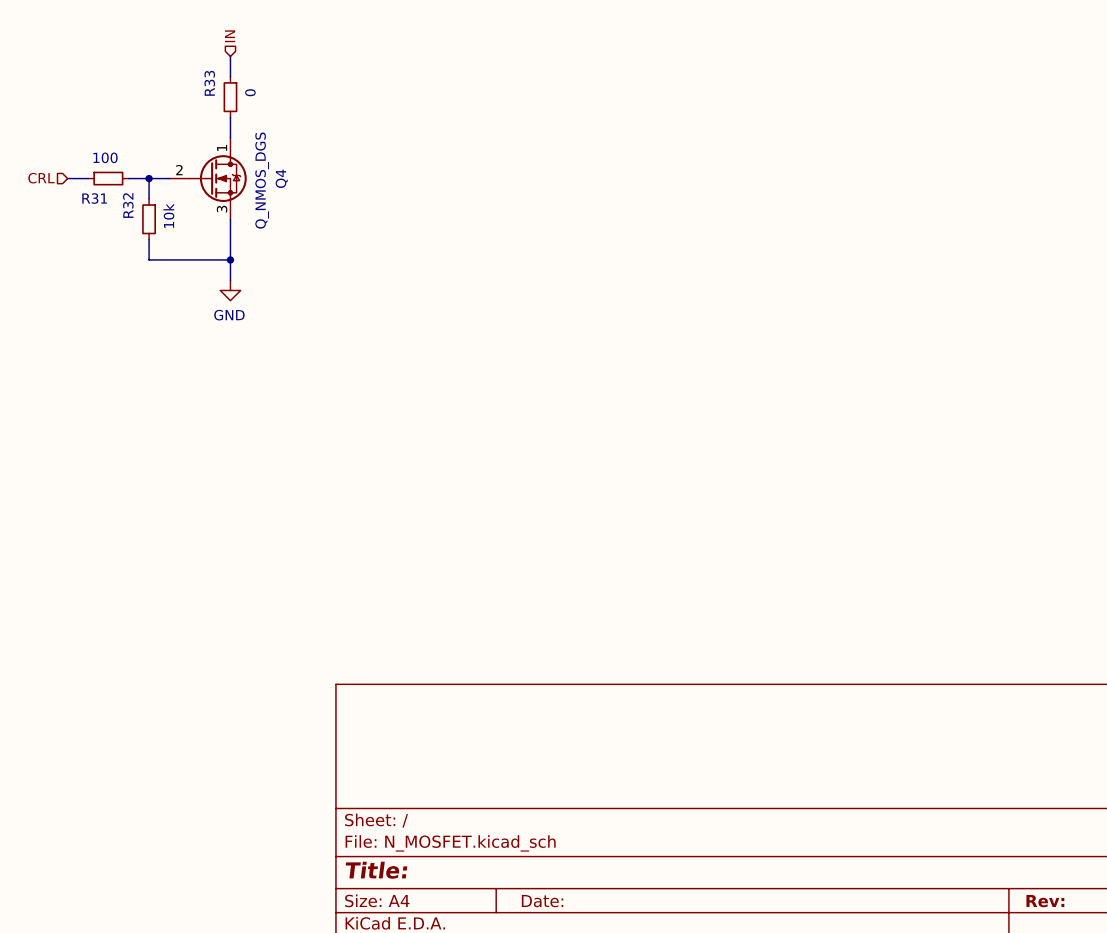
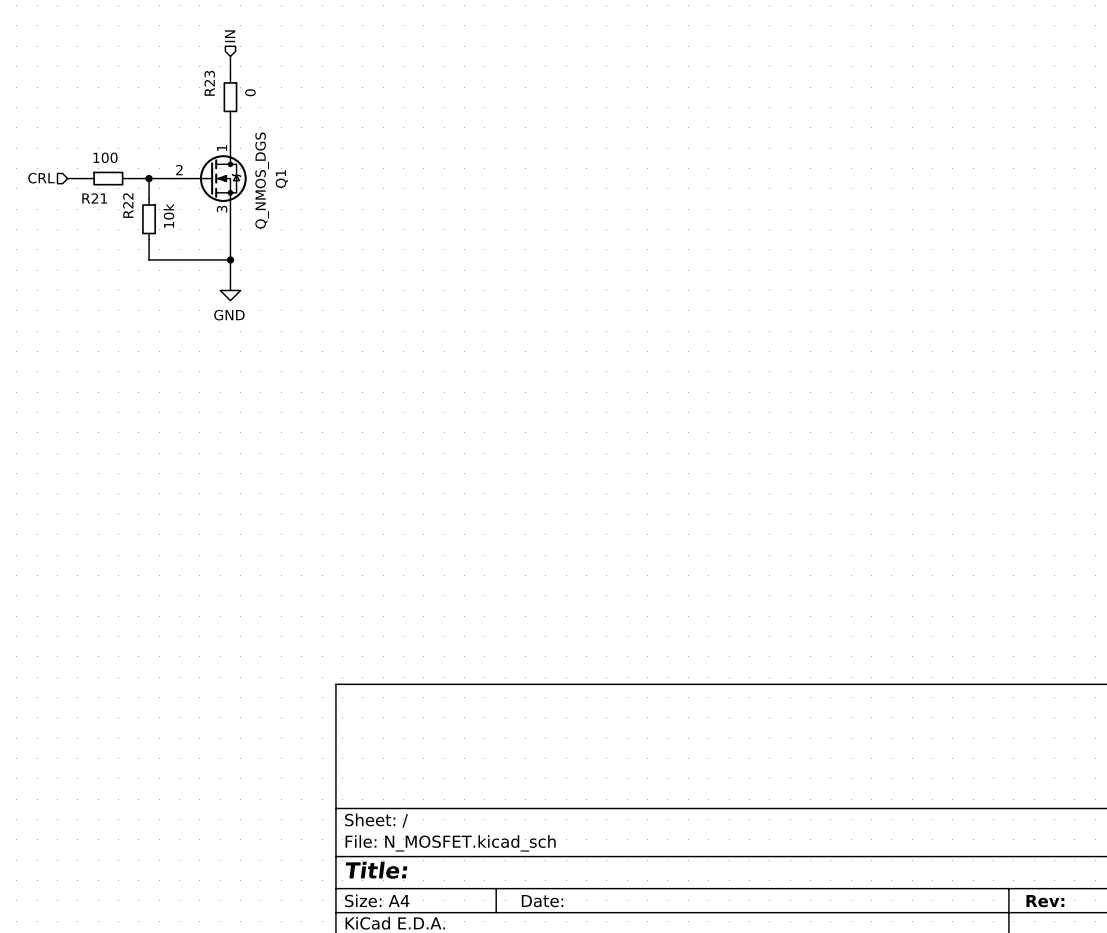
R33 name: R33 (209, 83) -> R23 (209, 83)
Q4 name: Q4 (281, 178) -> Q1 (281, 179)
R31 name: R31 (94, 198) -> R21 (94, 198)
R32 name: R32 (128, 205) -> R22 (128, 205)

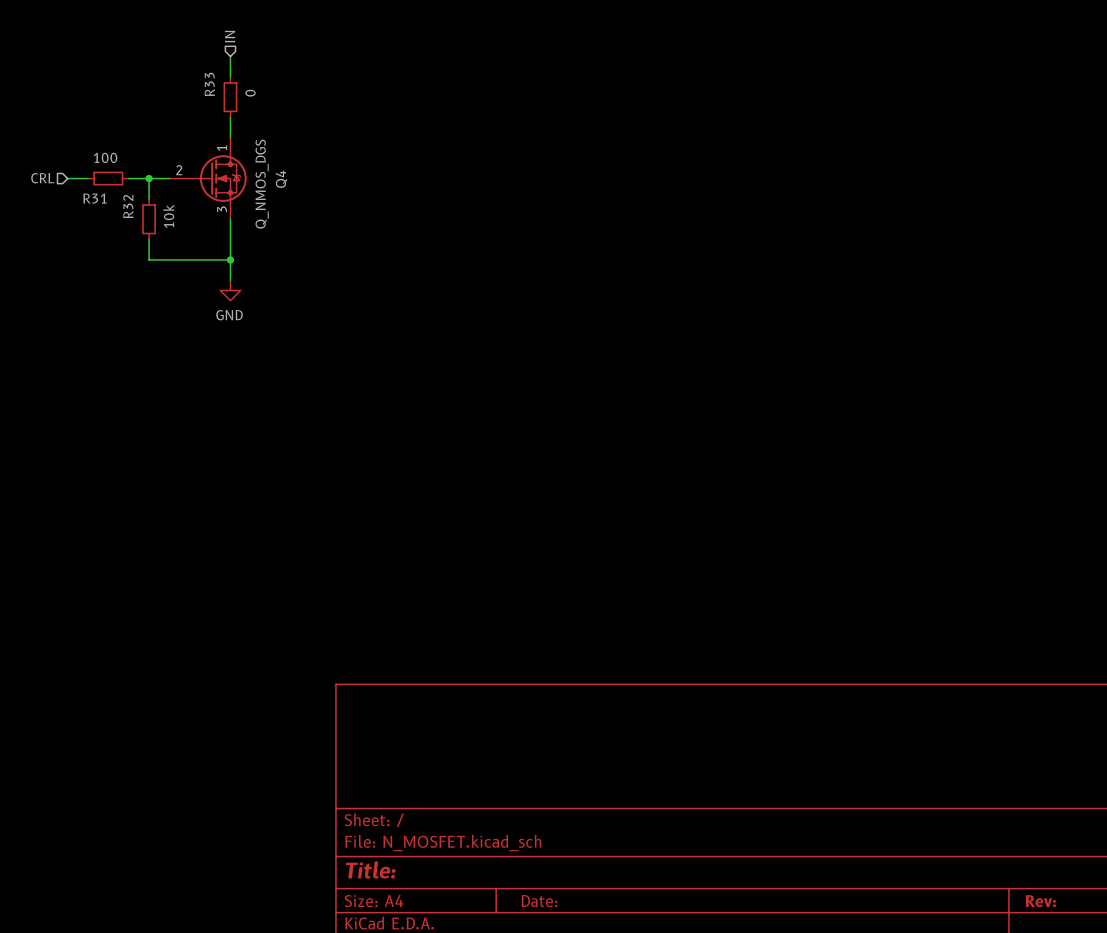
R23 name: R23 (209, 83) -> R33 (209, 84)
Q1 name: Q1 (281, 179) -> Q4 (281, 179)
R21 name: R21 (94, 198) -> R31 (94, 198)
R22 name: R22 (128, 205) -> R32 (128, 206)

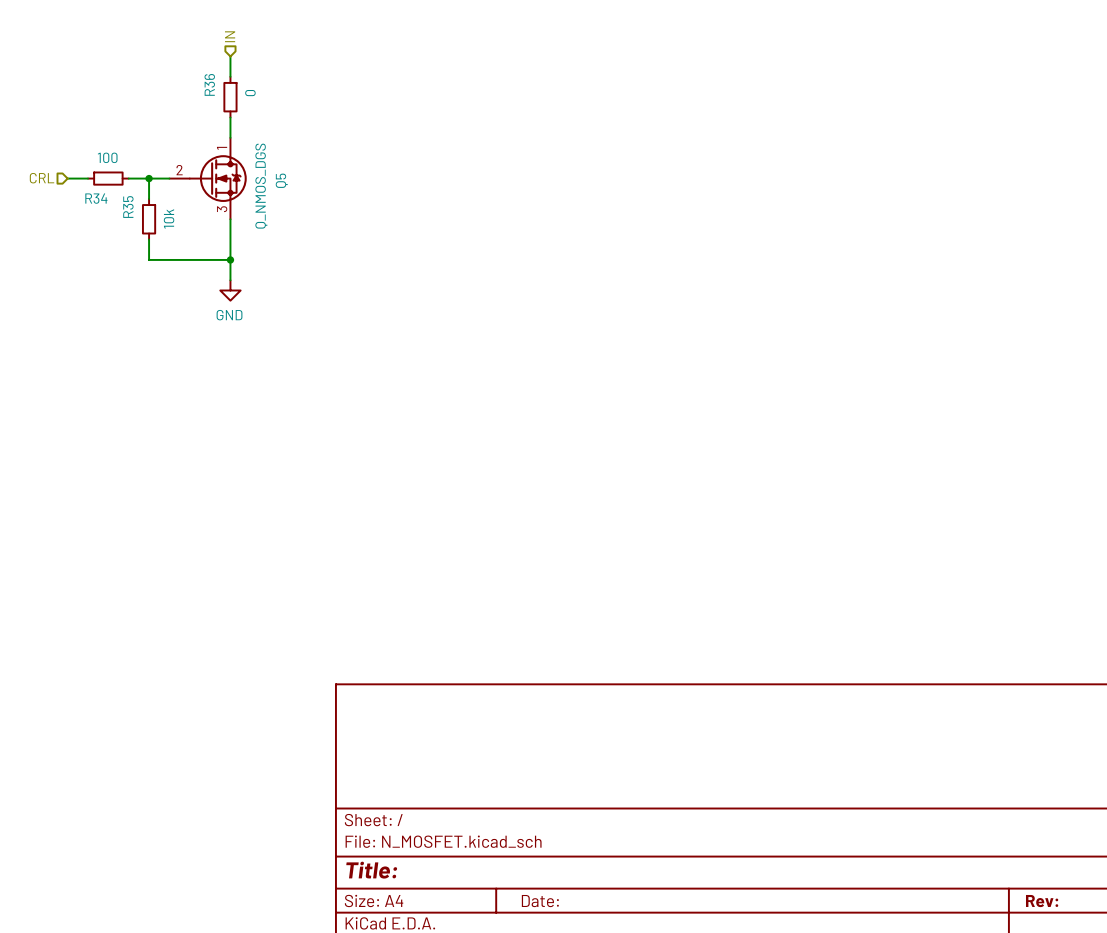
R33 name: R33 (209, 84) -> R36 (209, 84)
Q4 name: Q4 (281, 179) -> Q5 (281, 180)
R31 name: R31 (94, 198) -> R34 (96, 198)
R32 name: R32 (128, 206) -> R35 (128, 207)

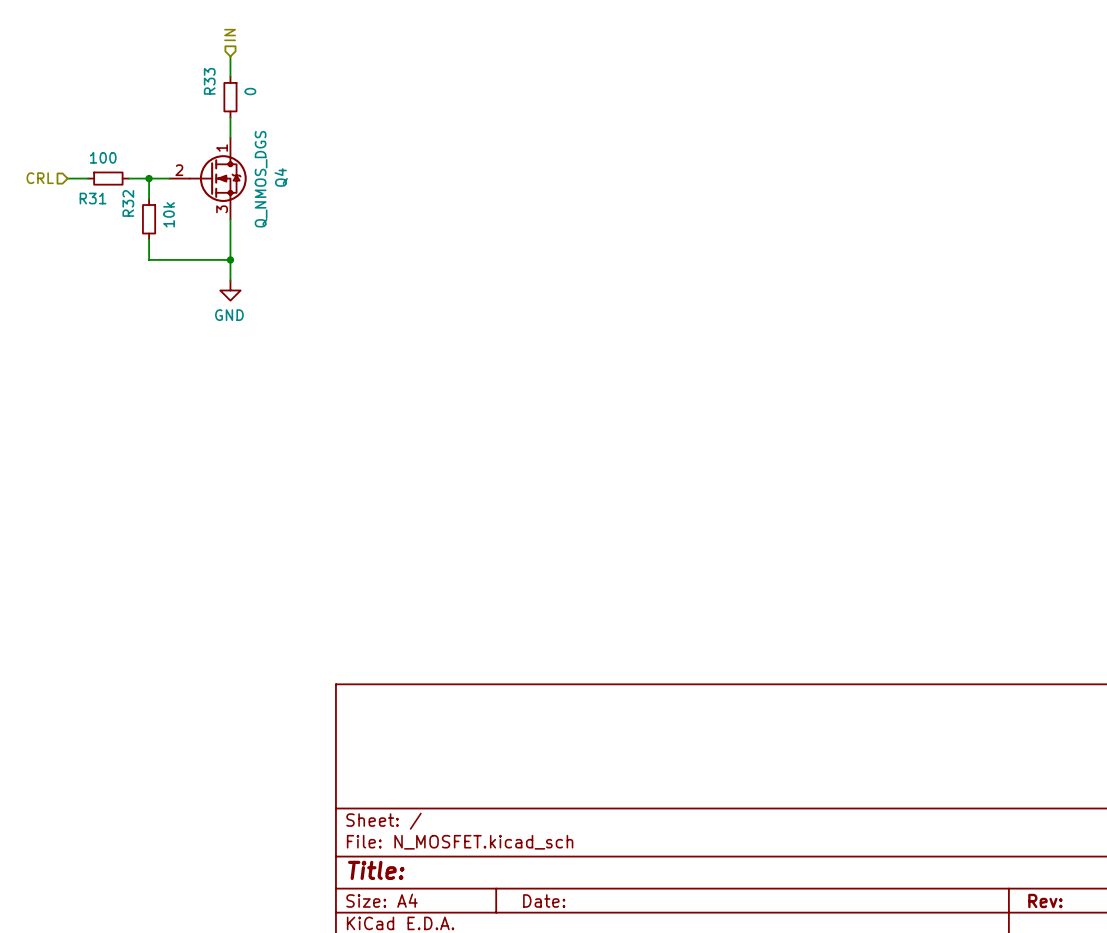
R36 name: R36 (209, 84) -> R33 (209, 81)
Q5 name: Q5 (281, 180) -> Q4 (281, 177)
R34 name: R34 (96, 198) -> R31 (93, 198)
R35 name: R35 (128, 207) -> R32 (128, 203)

